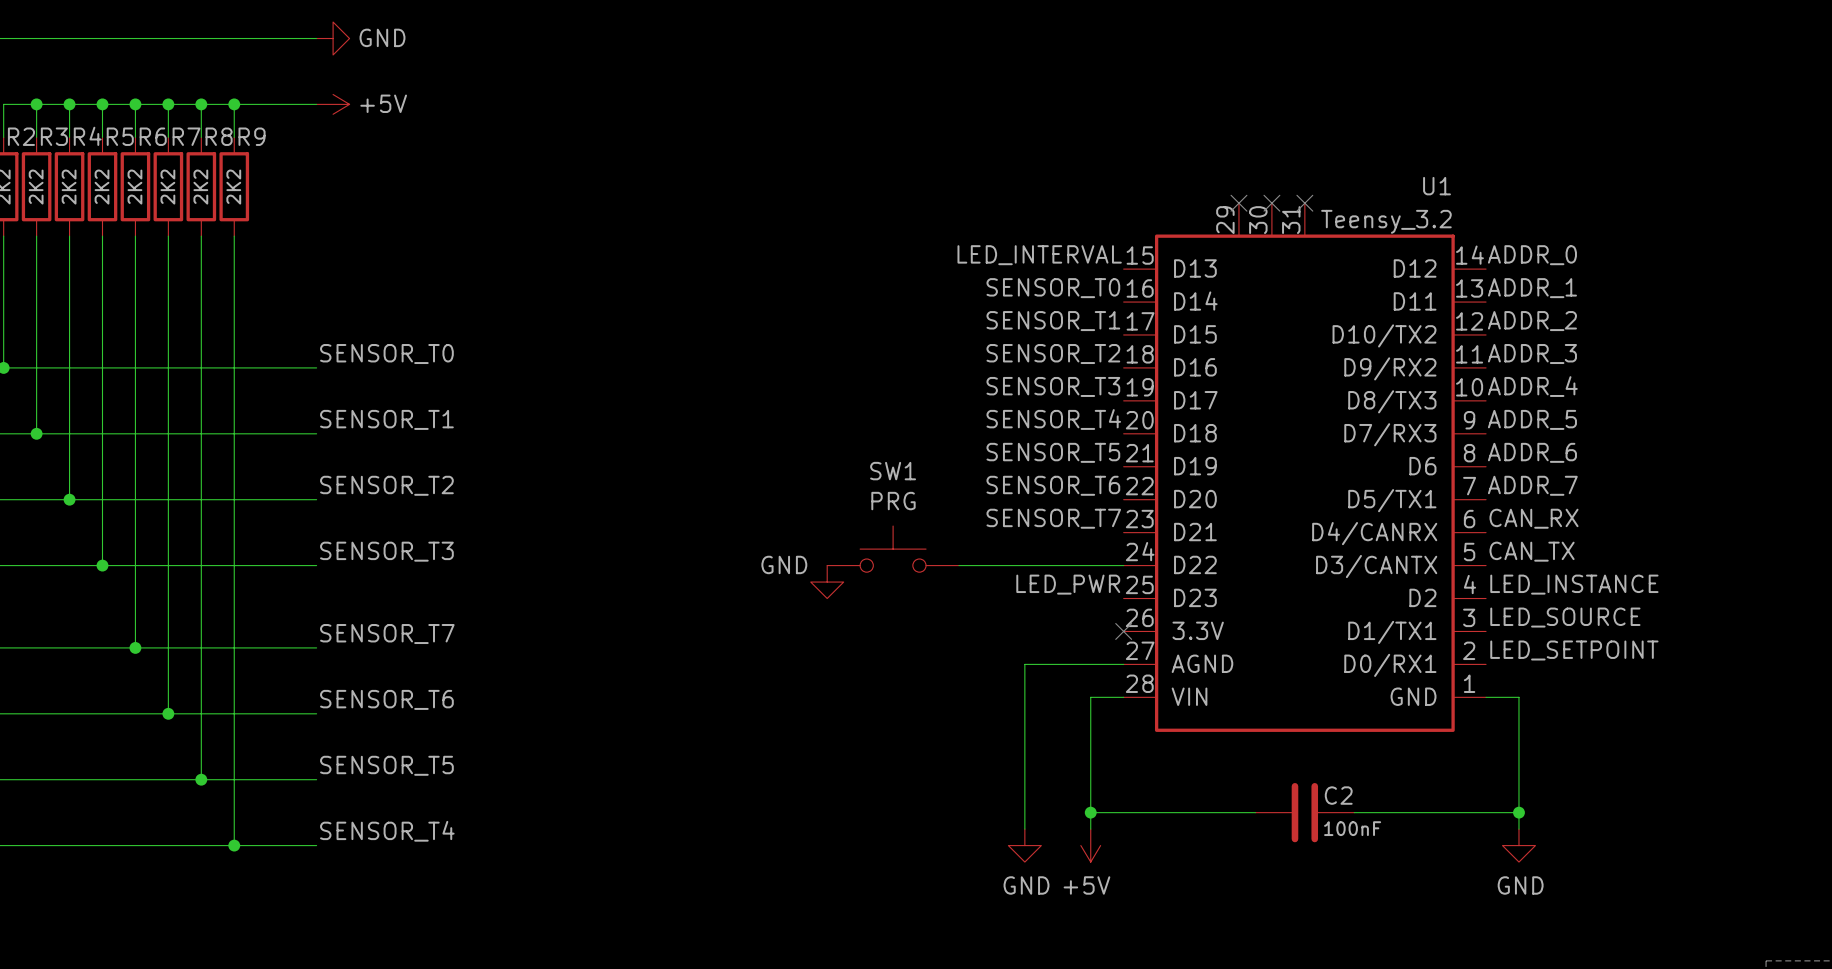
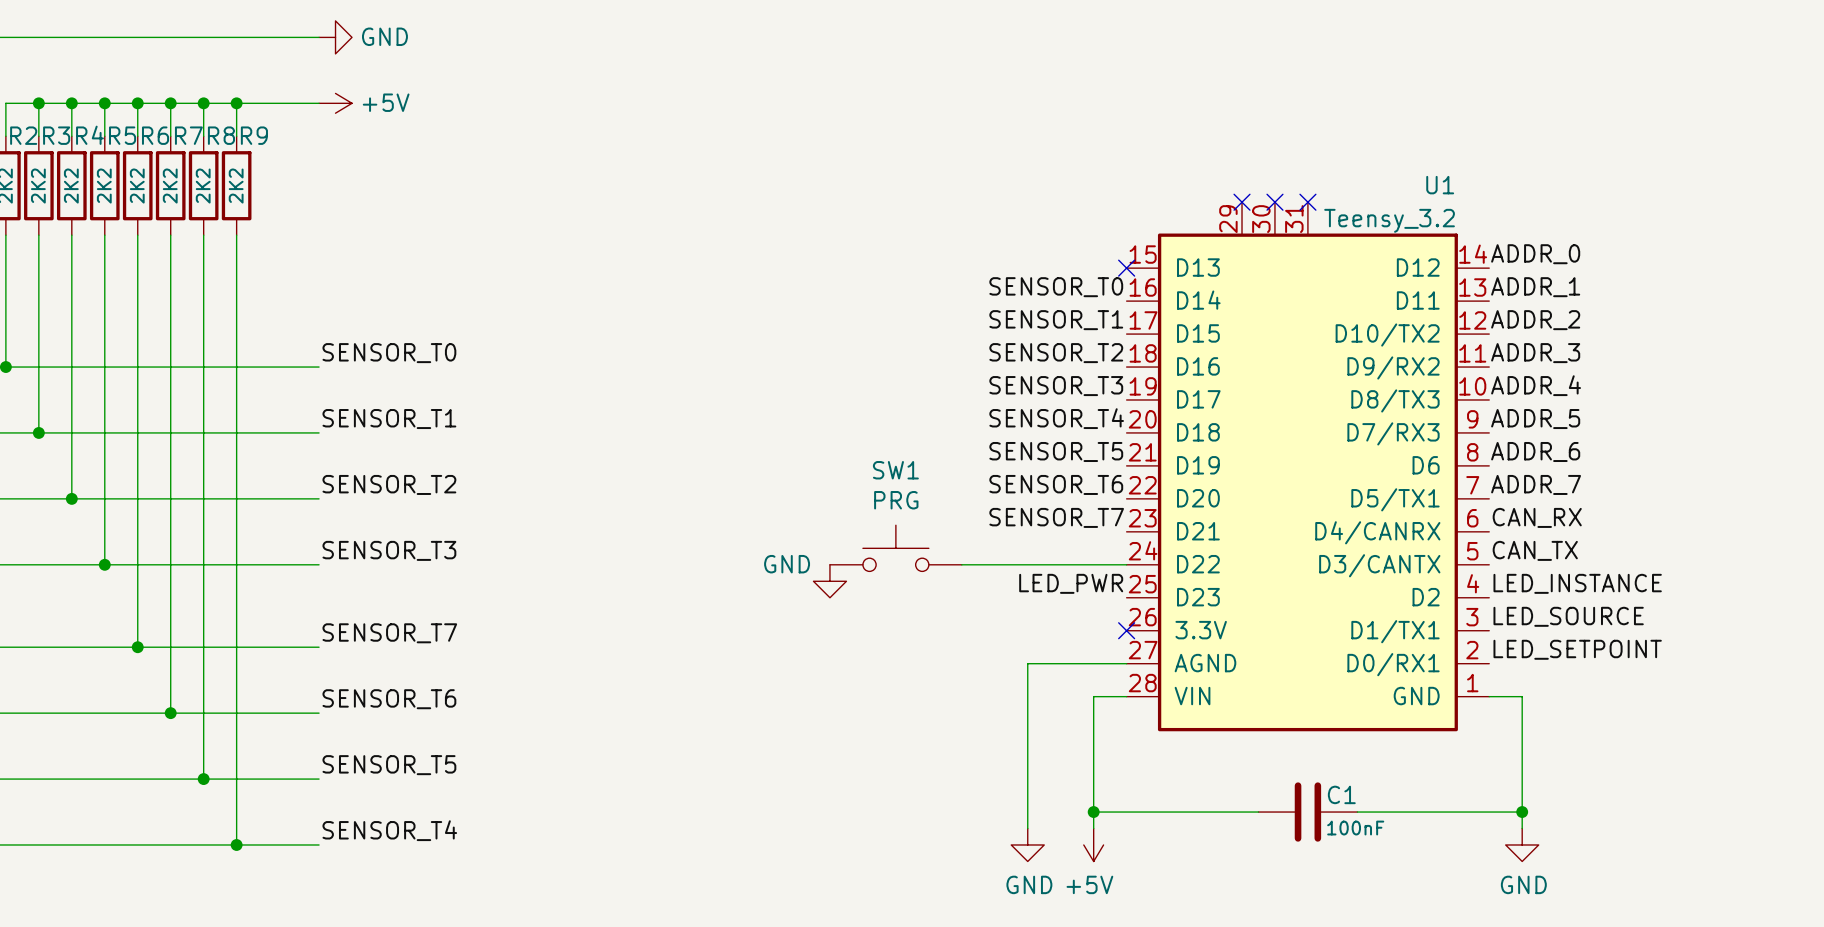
label: LED_INTERVAL (1039, 255) -> none
no-connect mark: none -> (1126, 268)
C2 name: C2 (1338, 795) -> C1 (1341, 794)

